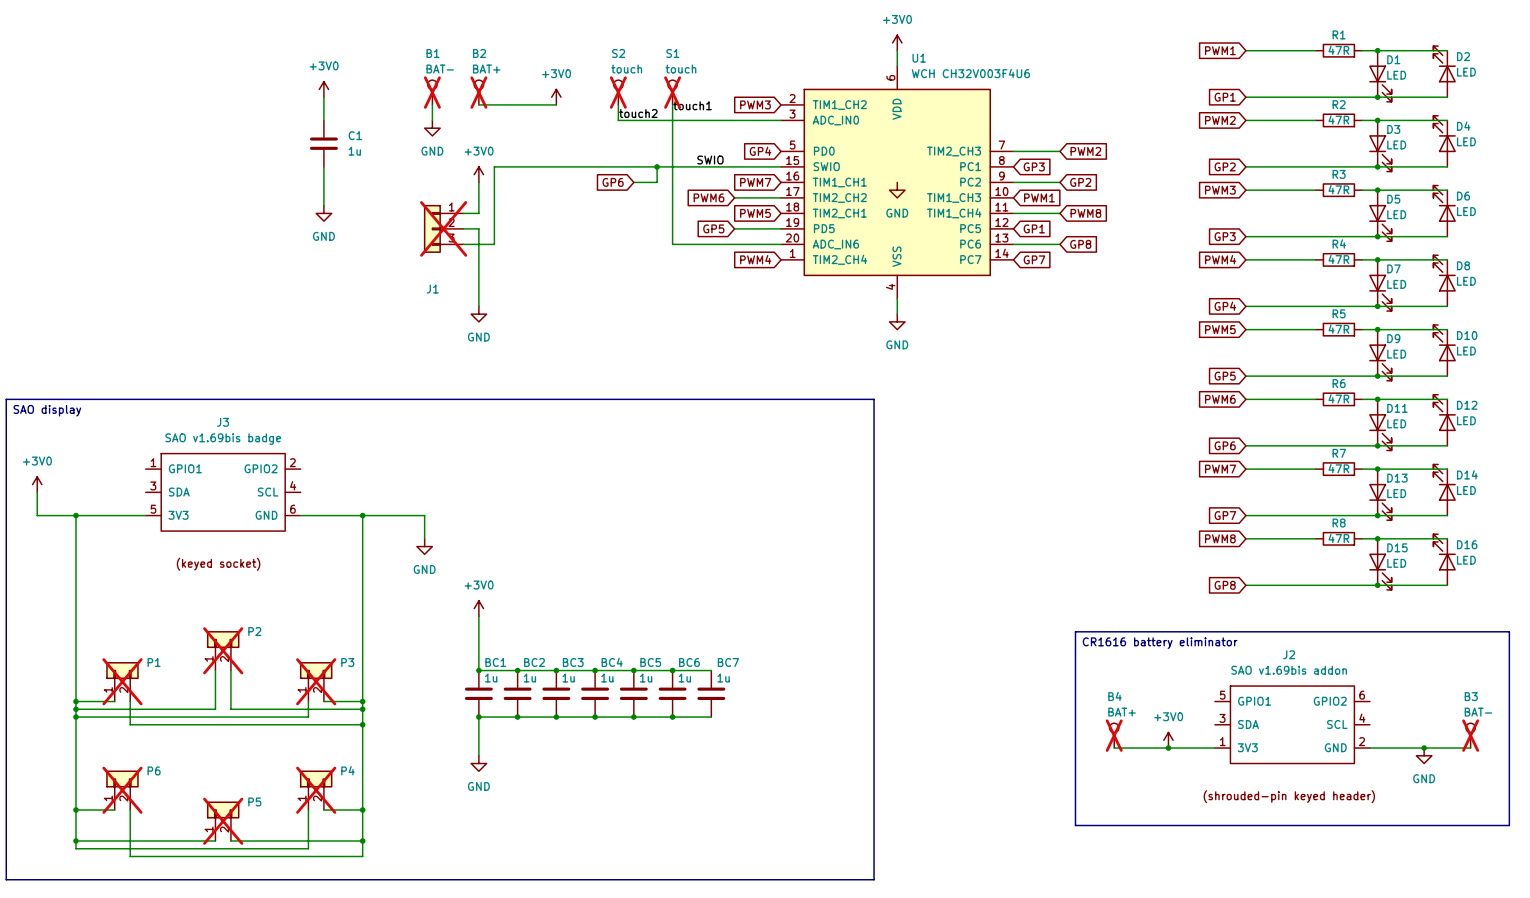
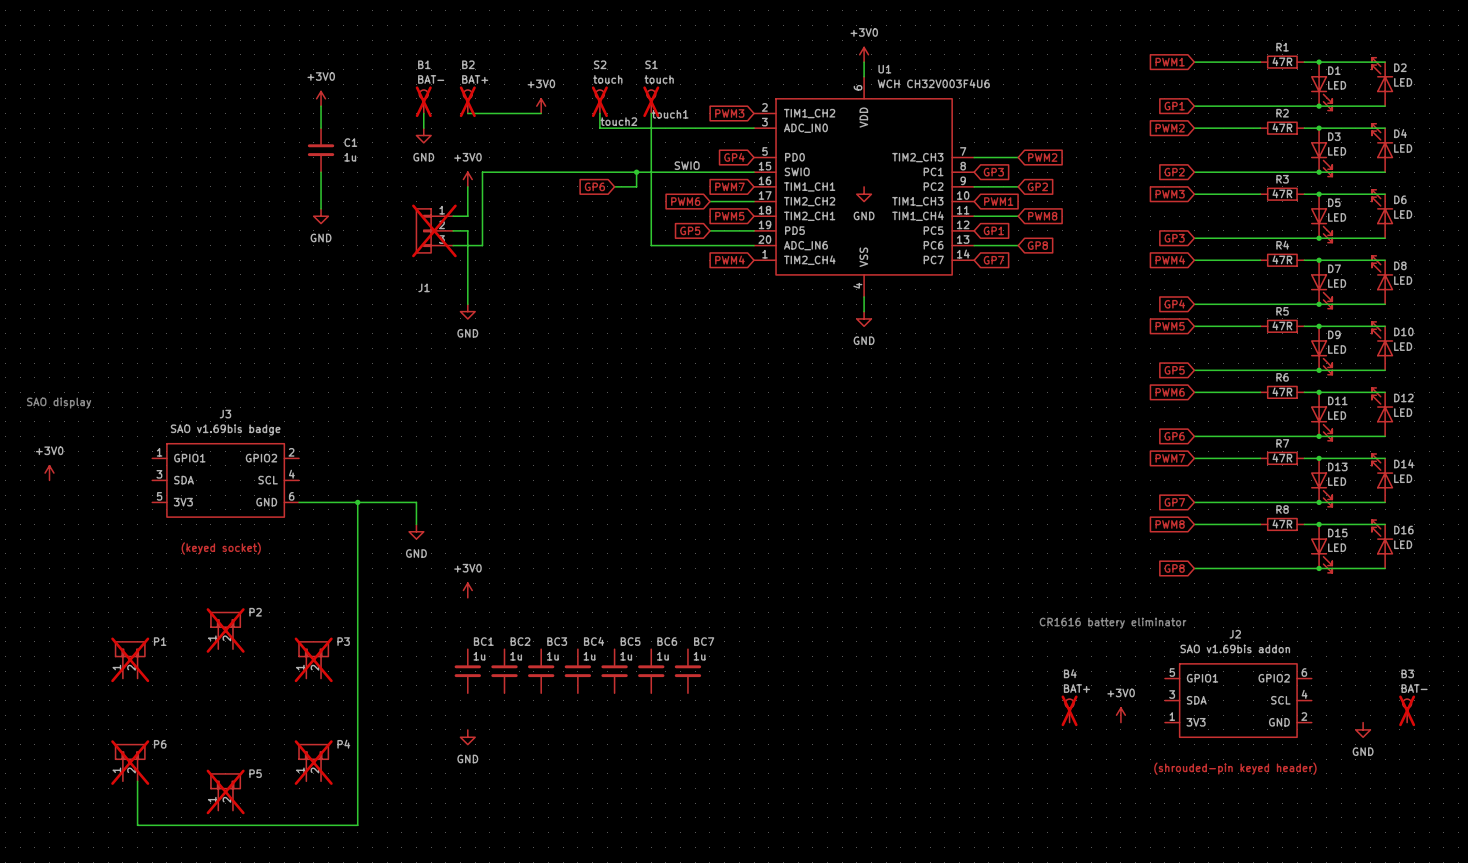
line: (6, 399) (874, 399) (874, 879) (6, 879) (6, 399) -> none
wire: (37, 492) (37, 515) (145, 515) -> none
wire: (75, 515) (75, 848) (308, 848) (308, 810) -> none
junction: (75, 515) -> none
wire: (478, 616) (478, 670) (711, 670) -> none
line: (1075, 631) (1509, 631) (1509, 825) (1075, 825) (1075, 631) -> none
wire: (215, 670) (215, 709) (75, 709) -> none
wire: (230, 670) (230, 709) (362, 709) -> none
junction: (478, 670) -> none
junction: (517, 670) -> none
junction: (556, 670) -> none
junction: (595, 670) -> none
junction: (633, 670) -> none
junction: (672, 670) -> none
wire: (75, 701) (114, 701) -> none
junction: (75, 701) -> none
wire: (130, 701) (130, 724) (362, 724) -> none
wire: (308, 701) (308, 717) (75, 717) -> none
wire: (323, 701) (362, 701) -> none
junction: (362, 701) -> none
junction: (75, 709) -> none
junction: (362, 709) -> none
junction: (75, 717) -> none
junction: (478, 717) -> none
junction: (517, 717) -> none
junction: (556, 717) -> none
junction: (595, 717) -> none
junction: (633, 717) -> none
junction: (672, 717) -> none
wire: (711, 717) (478, 717) (478, 755) -> none
junction: (362, 724) -> none
wire: (1114, 748) (1214, 748) -> none
junction: (1168, 748) -> none
wire: (1369, 748) (1470, 748) -> none
junction: (1424, 748) -> none
wire: (75, 810) (114, 810) -> none
junction: (75, 810) -> none
wire: (323, 810) (362, 810) -> none
junction: (362, 810) -> none
wire: (75, 841) (215, 841) -> none
junction: (75, 841) -> none
wire: (230, 841) (362, 841) -> none
junction: (362, 841) -> none

